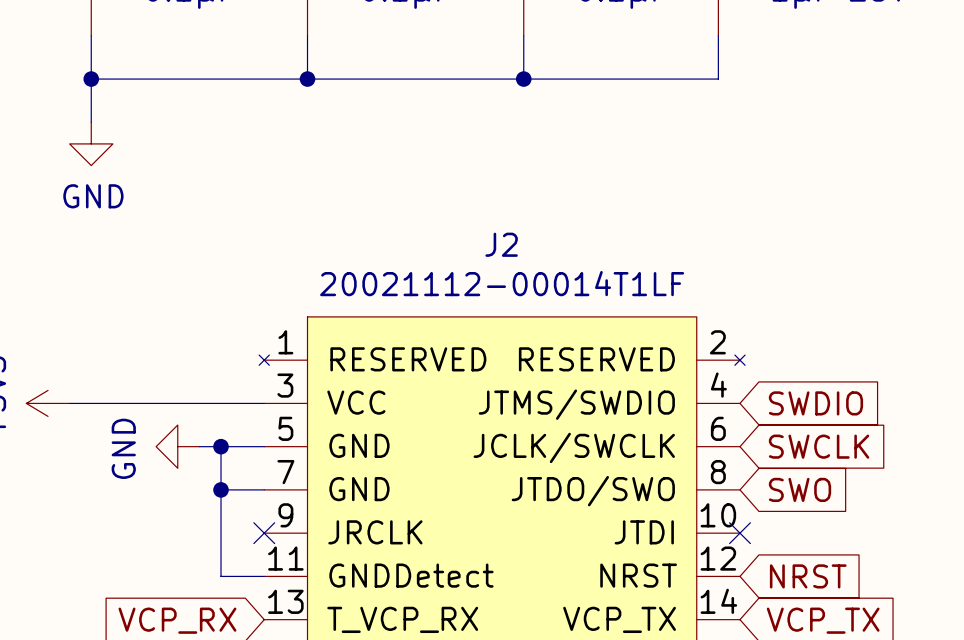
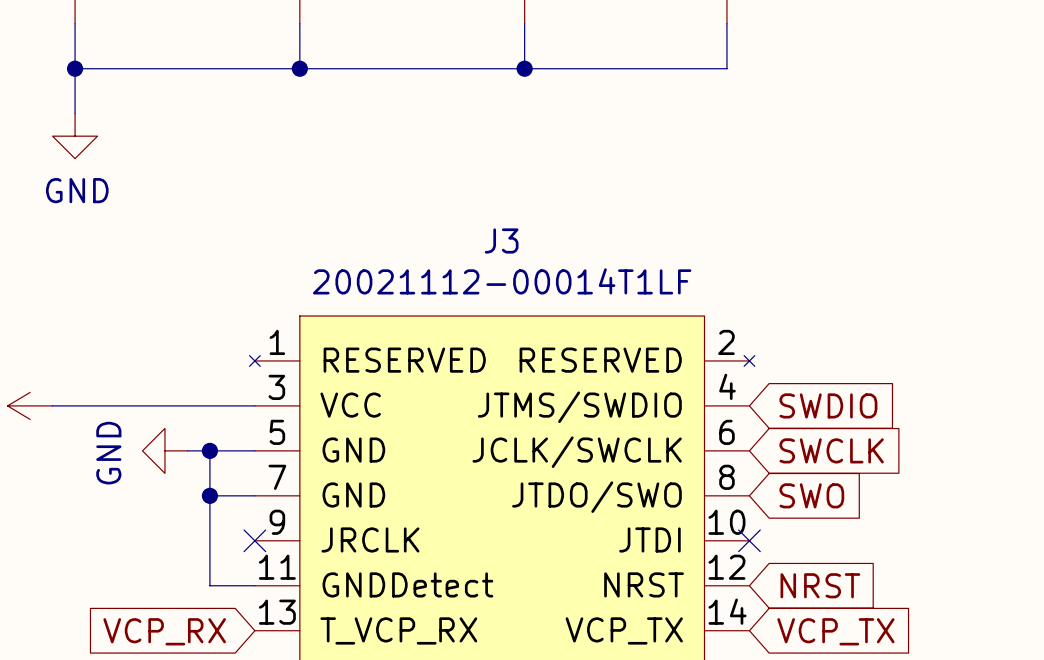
J2 name: J2 (501, 244) -> J3 (501, 240)

